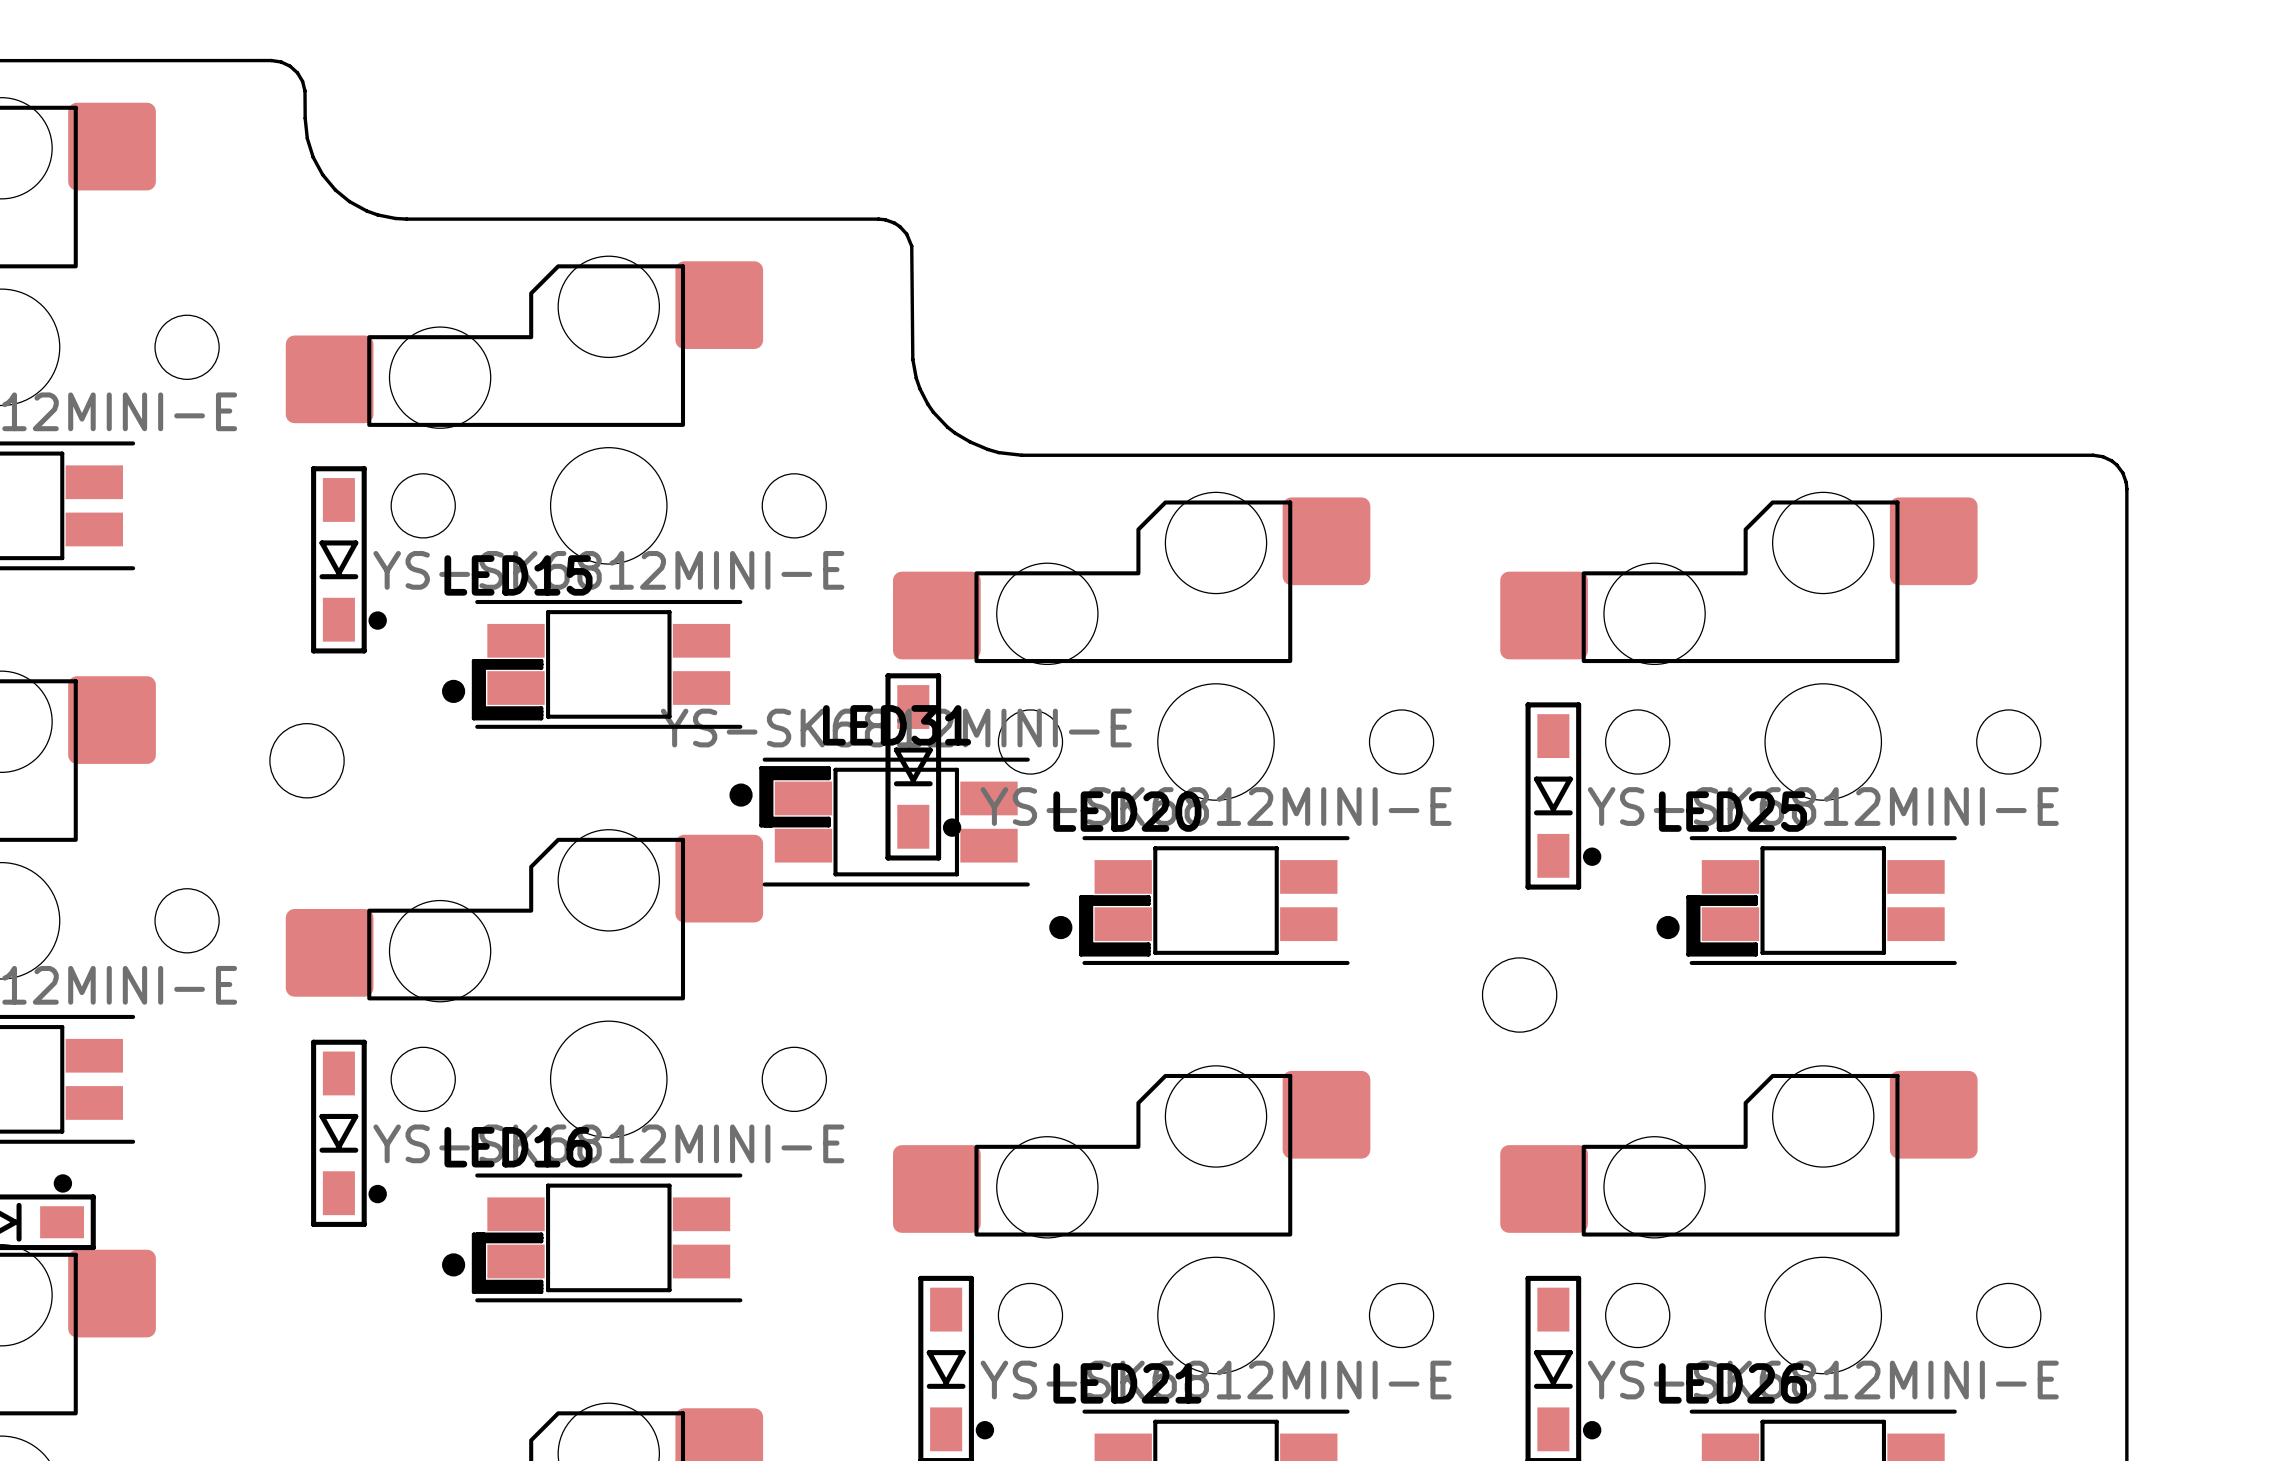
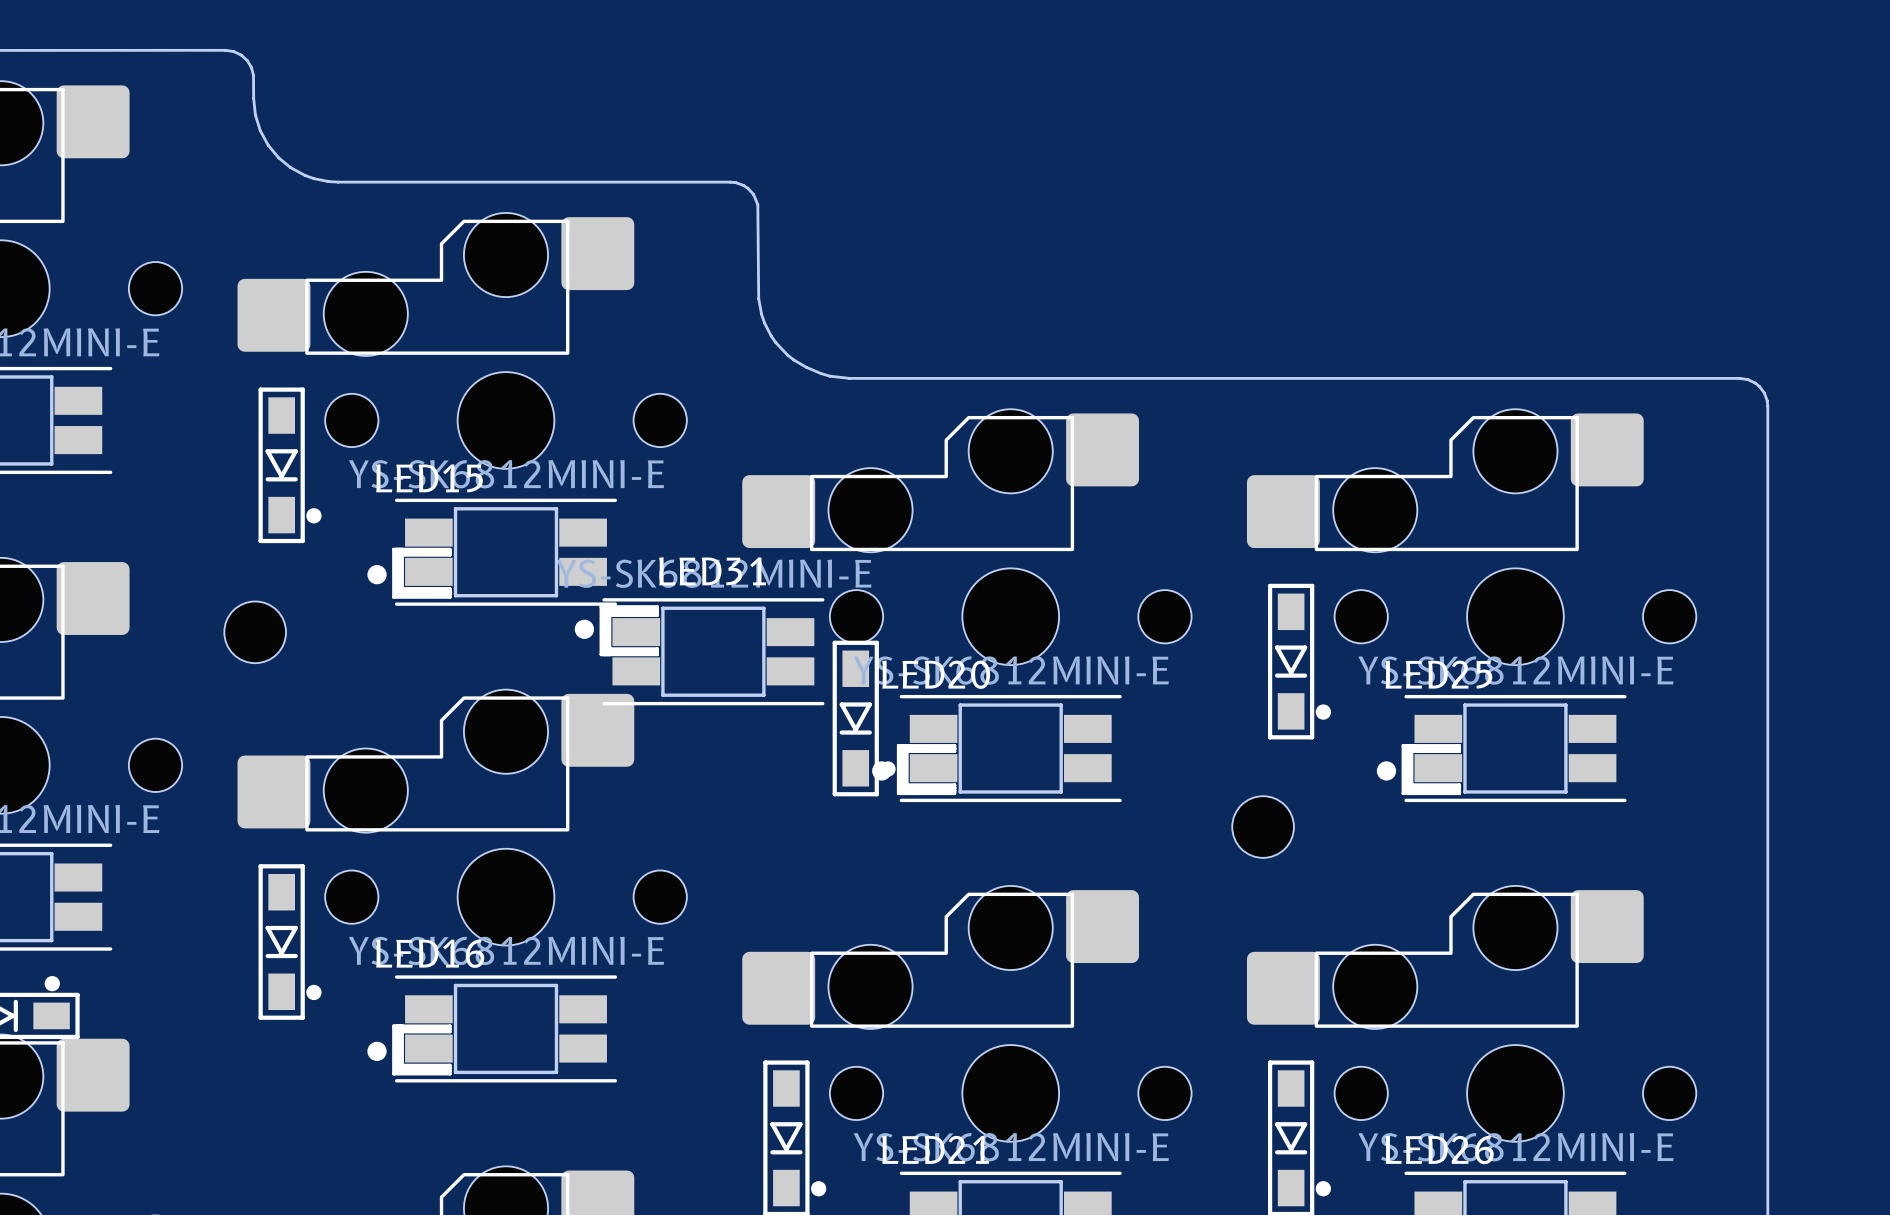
part position: (923, 766) -> (864, 718)
LED31 position: (879, 822) -> (699, 651)

